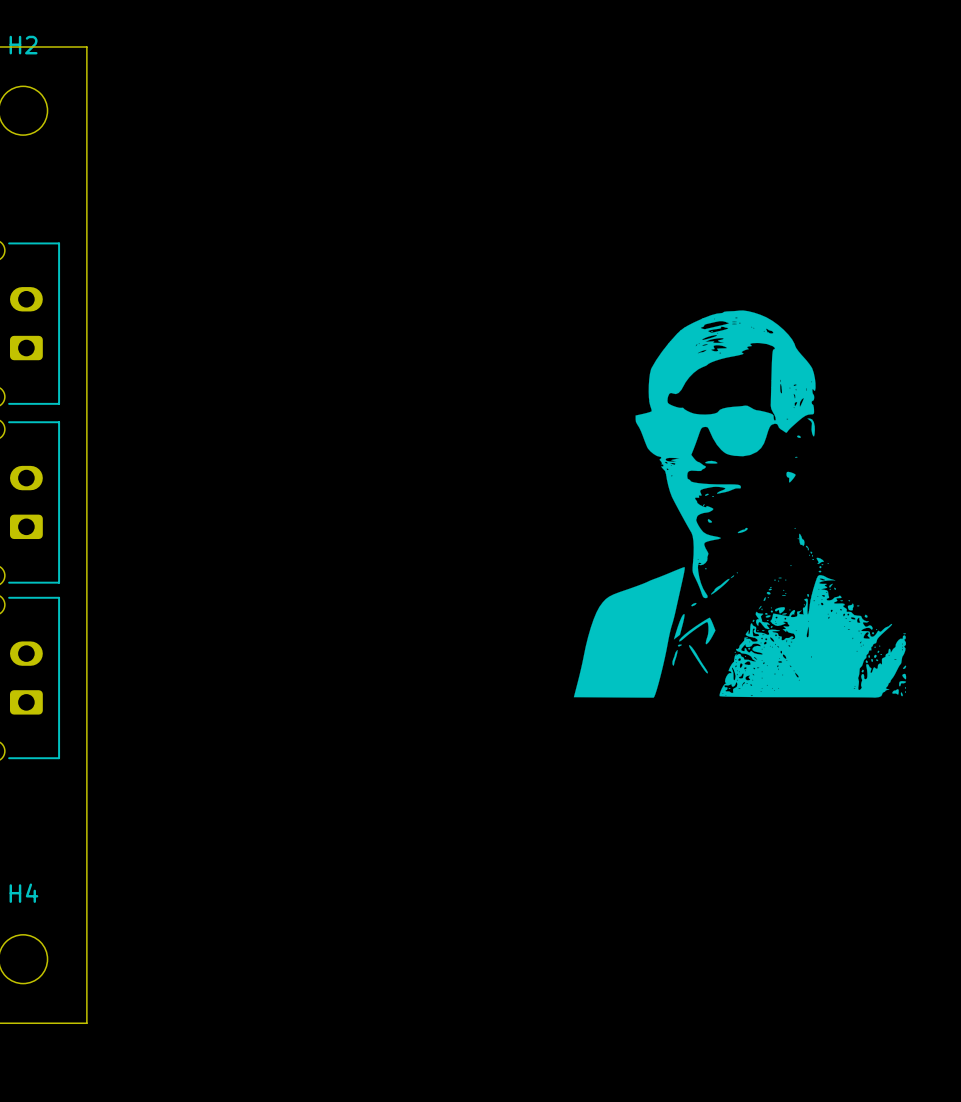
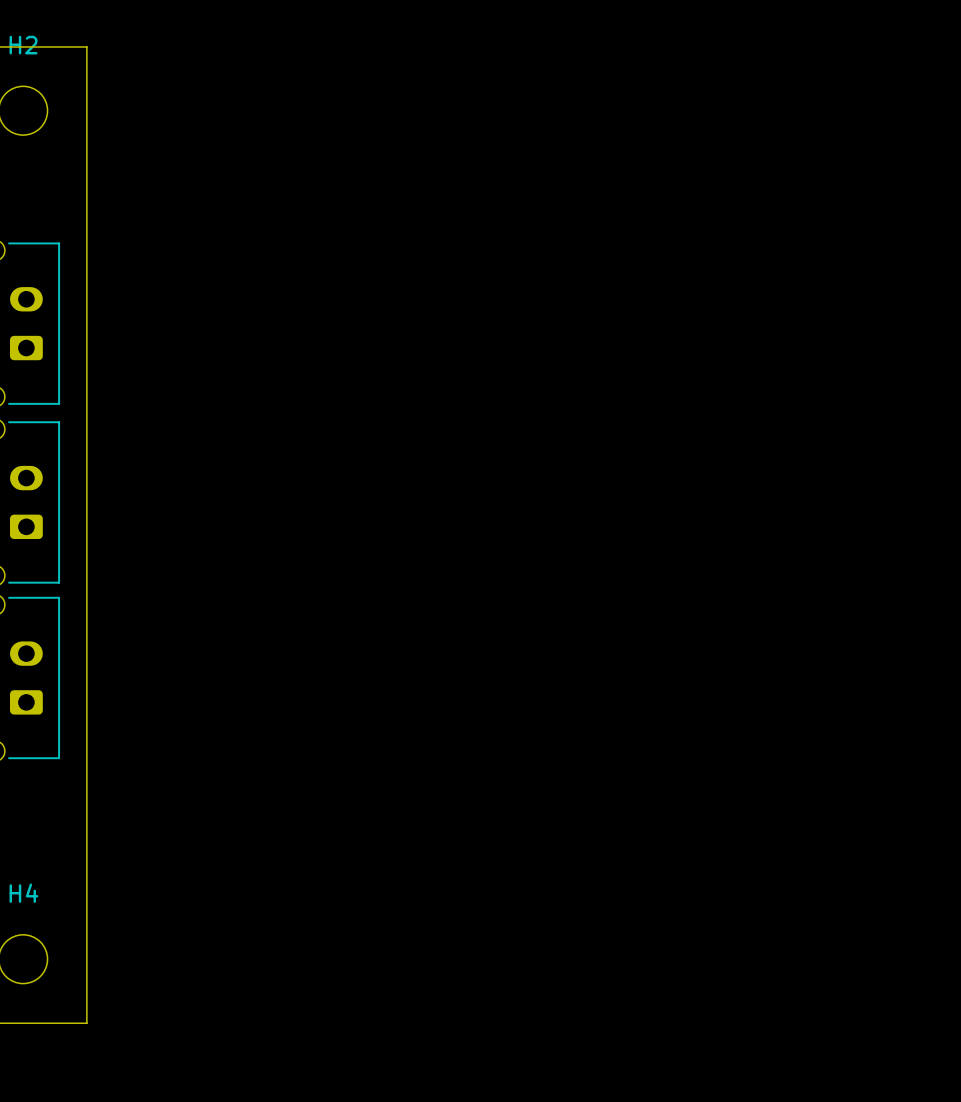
drawing: [573, 310, 907, 698] -> none

